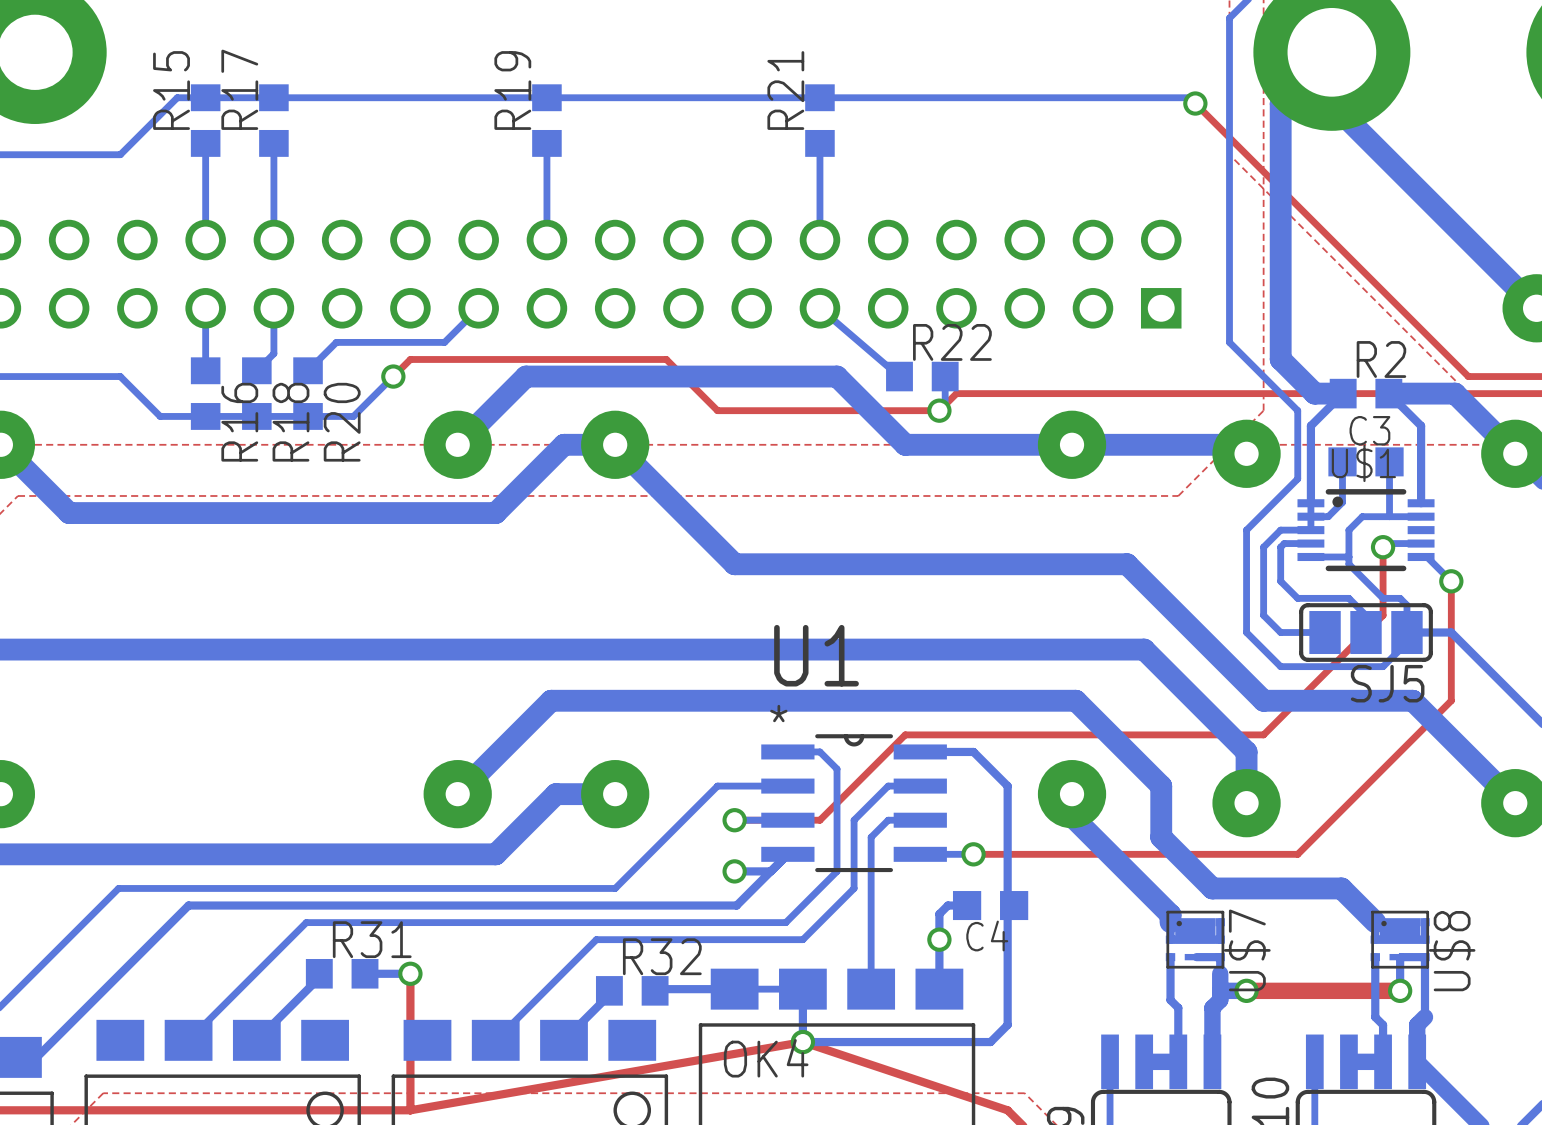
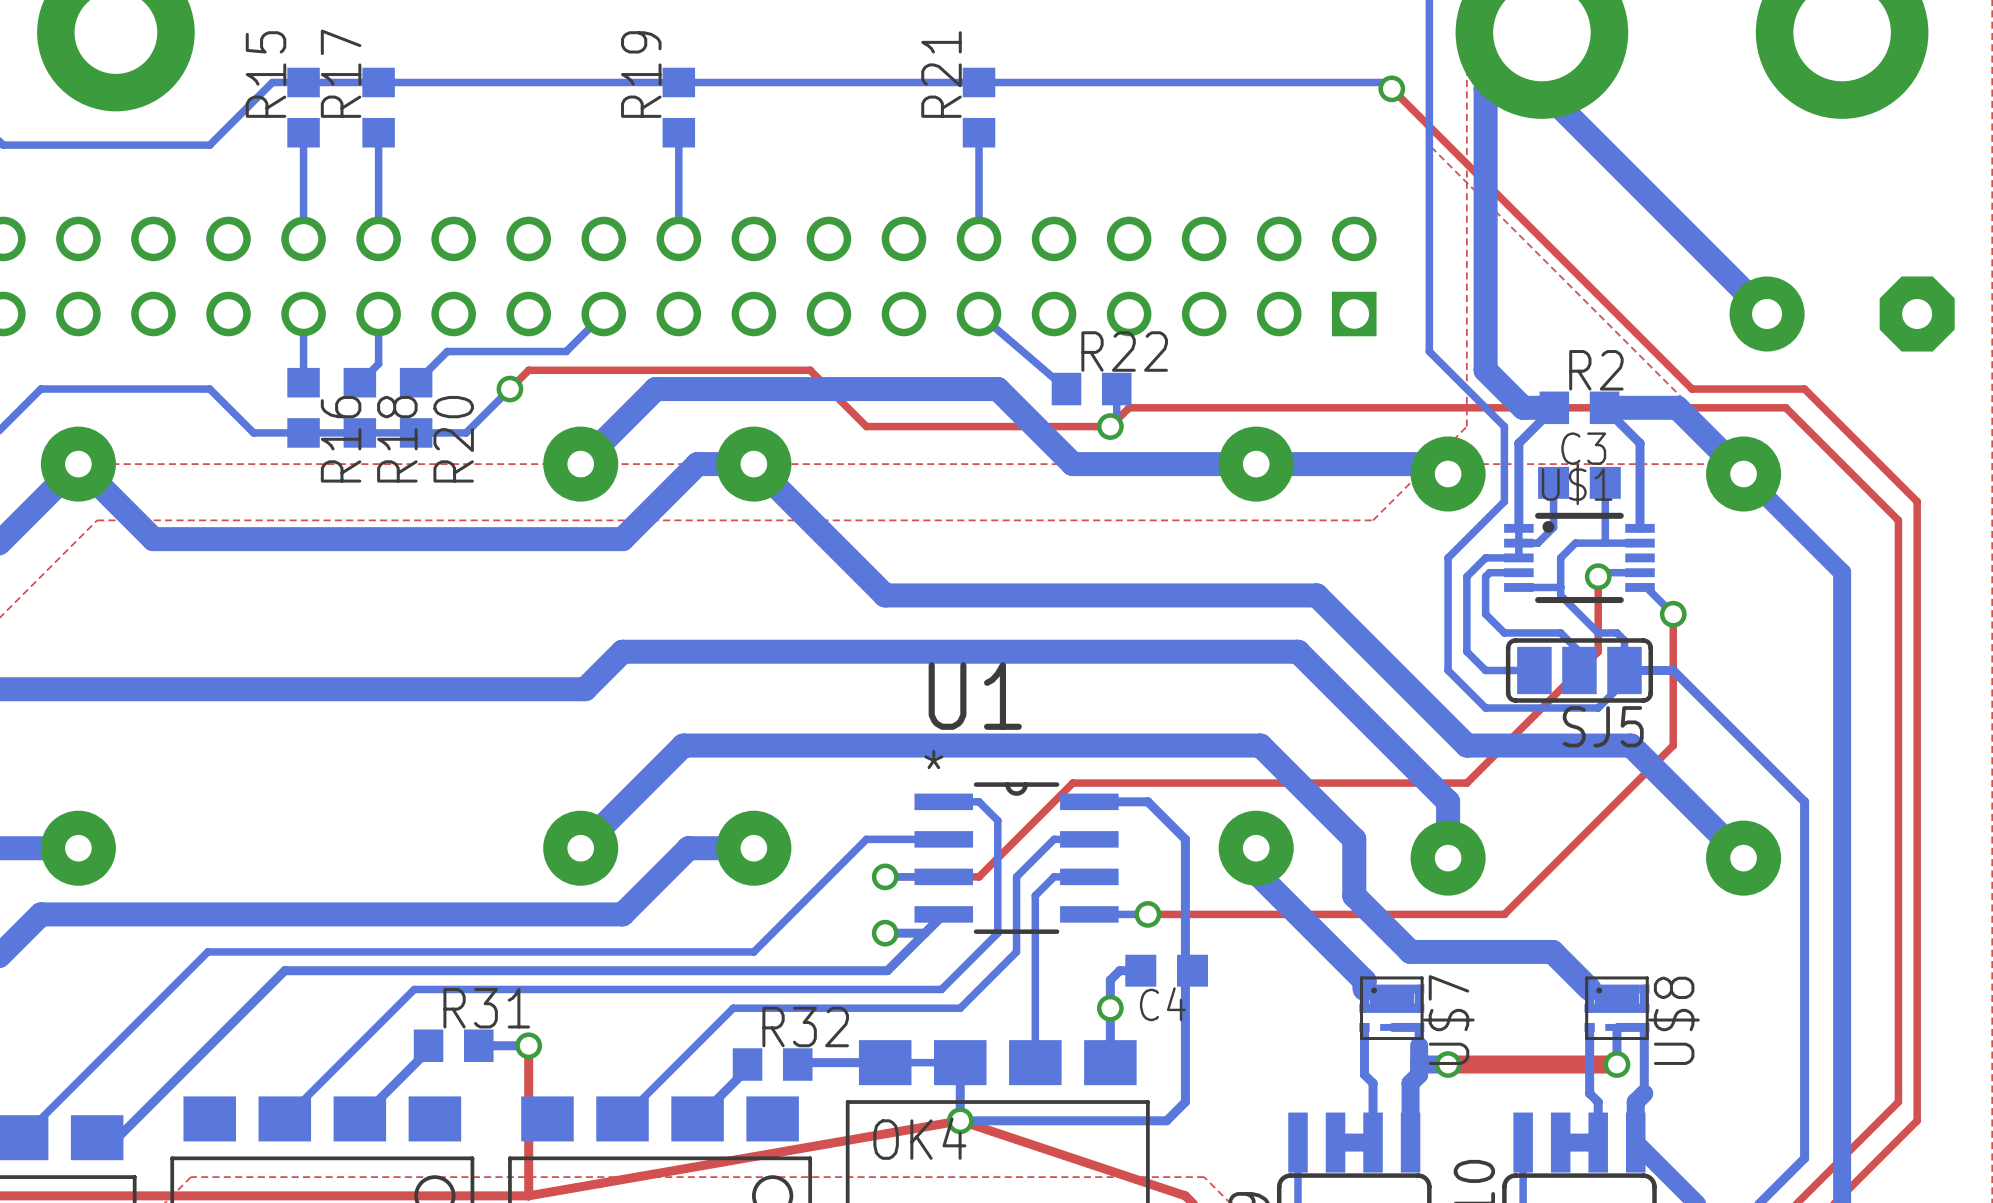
bottom track: (1144, 649) (461, 649) -> (1335, 689) (1297, 651) (622, 651) (585, 689)

